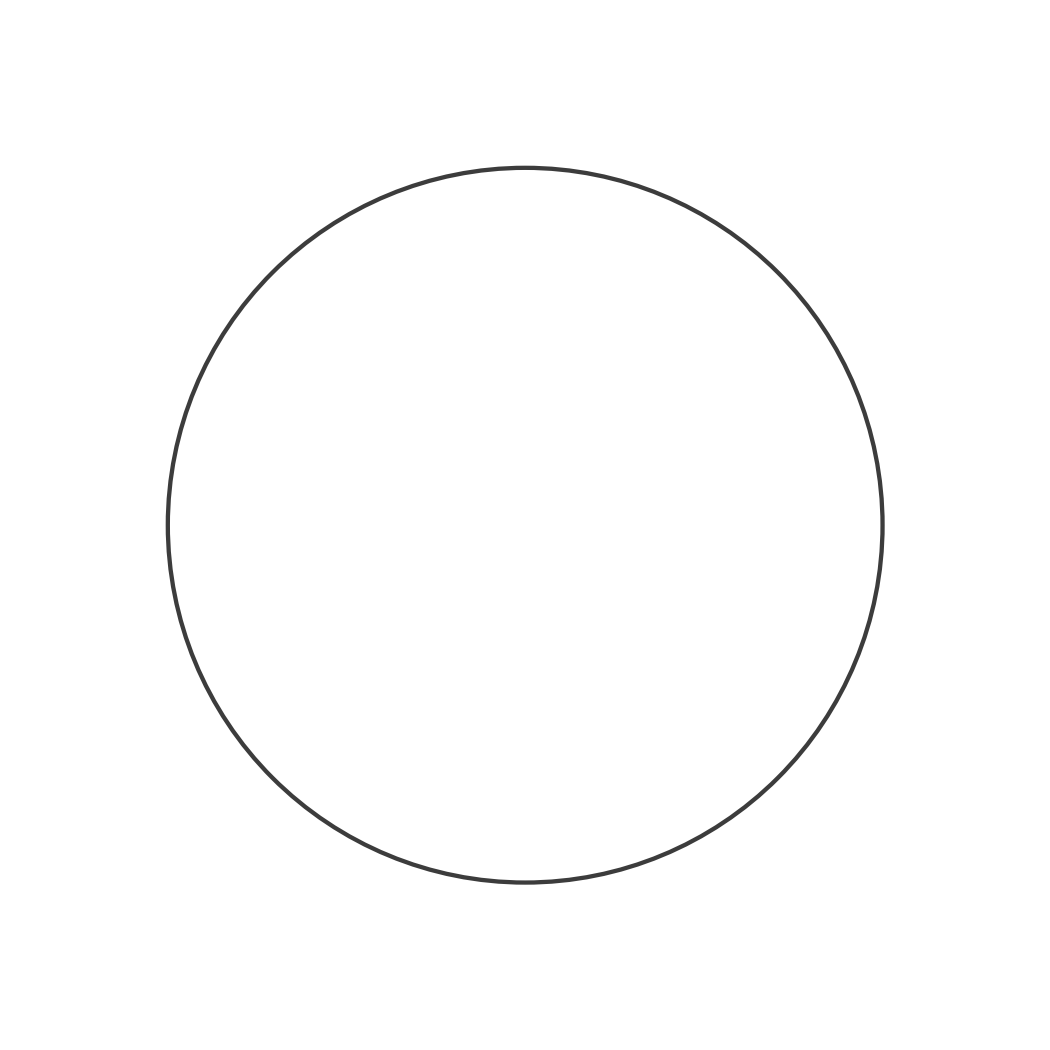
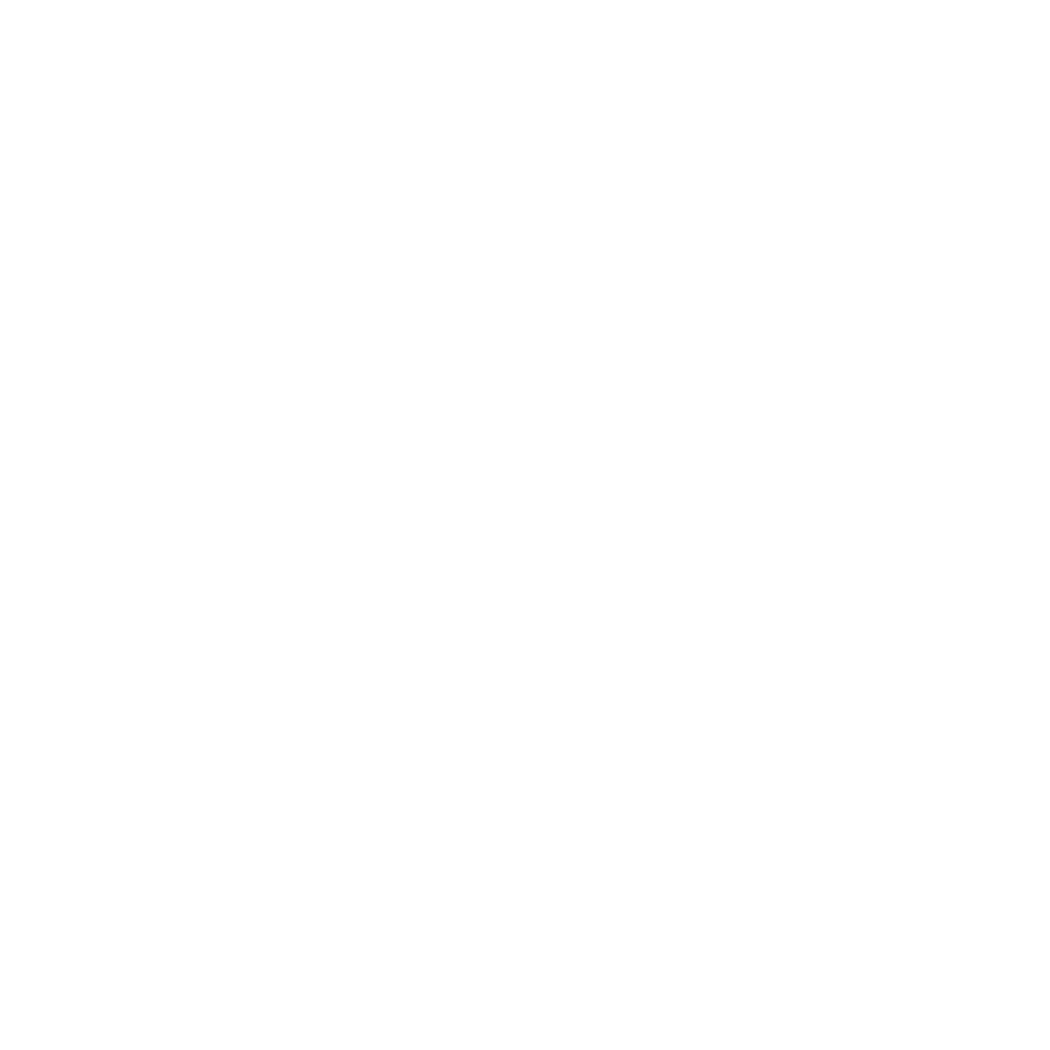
drawing: [165, 165, 885, 885] -> none

